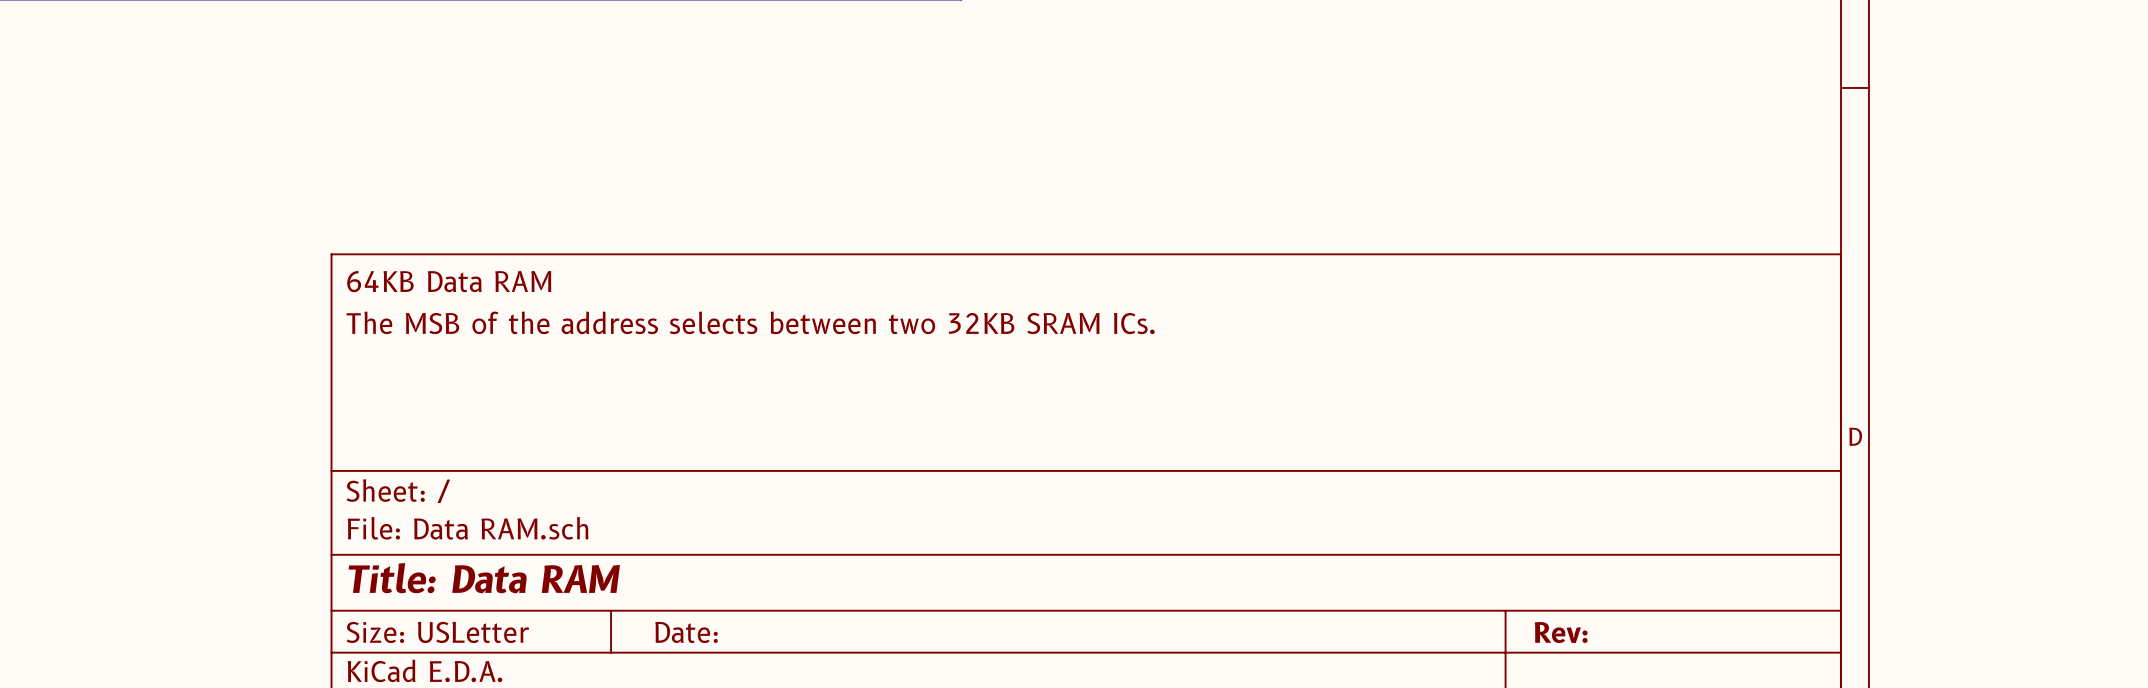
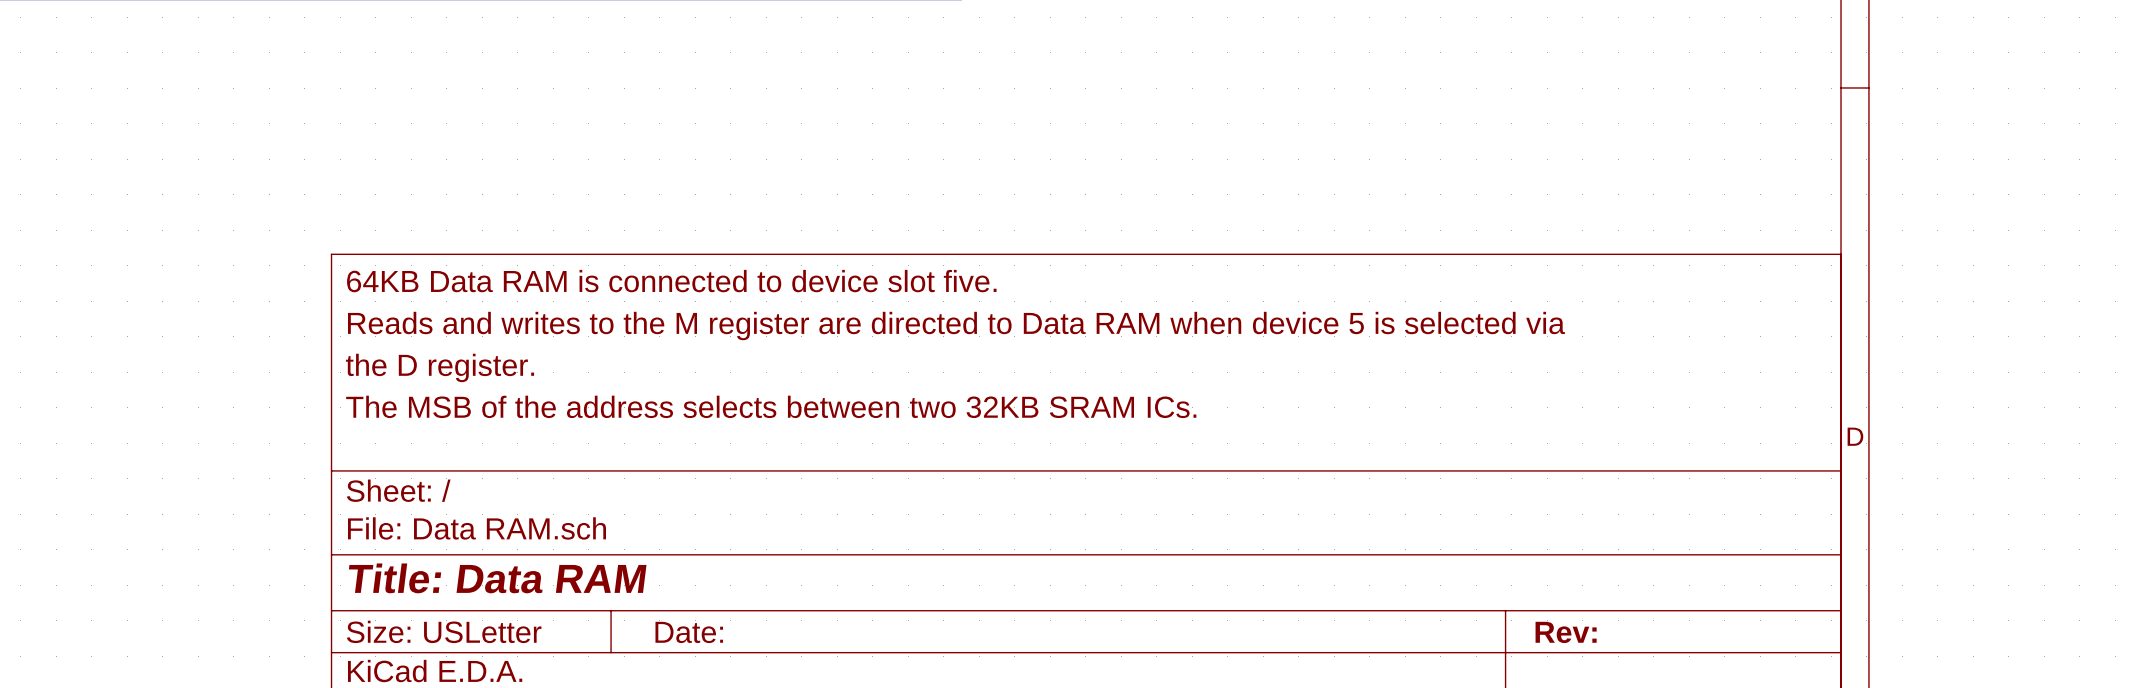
title block: 64KB Data RAM (449, 281) -> 64KB Data RAM is connected to device slot five. (671, 281)
title block: The MSB of the address selects between two 32KB SRAM ICs. (750, 322) -> Reads and writes to the M register are directed to Data RAM when device 5 is selected via (956, 326)
title block: none -> the D register. (440, 367)
title block: none -> The MSB of the address selects between two 32KB SRAM ICs. (771, 406)

